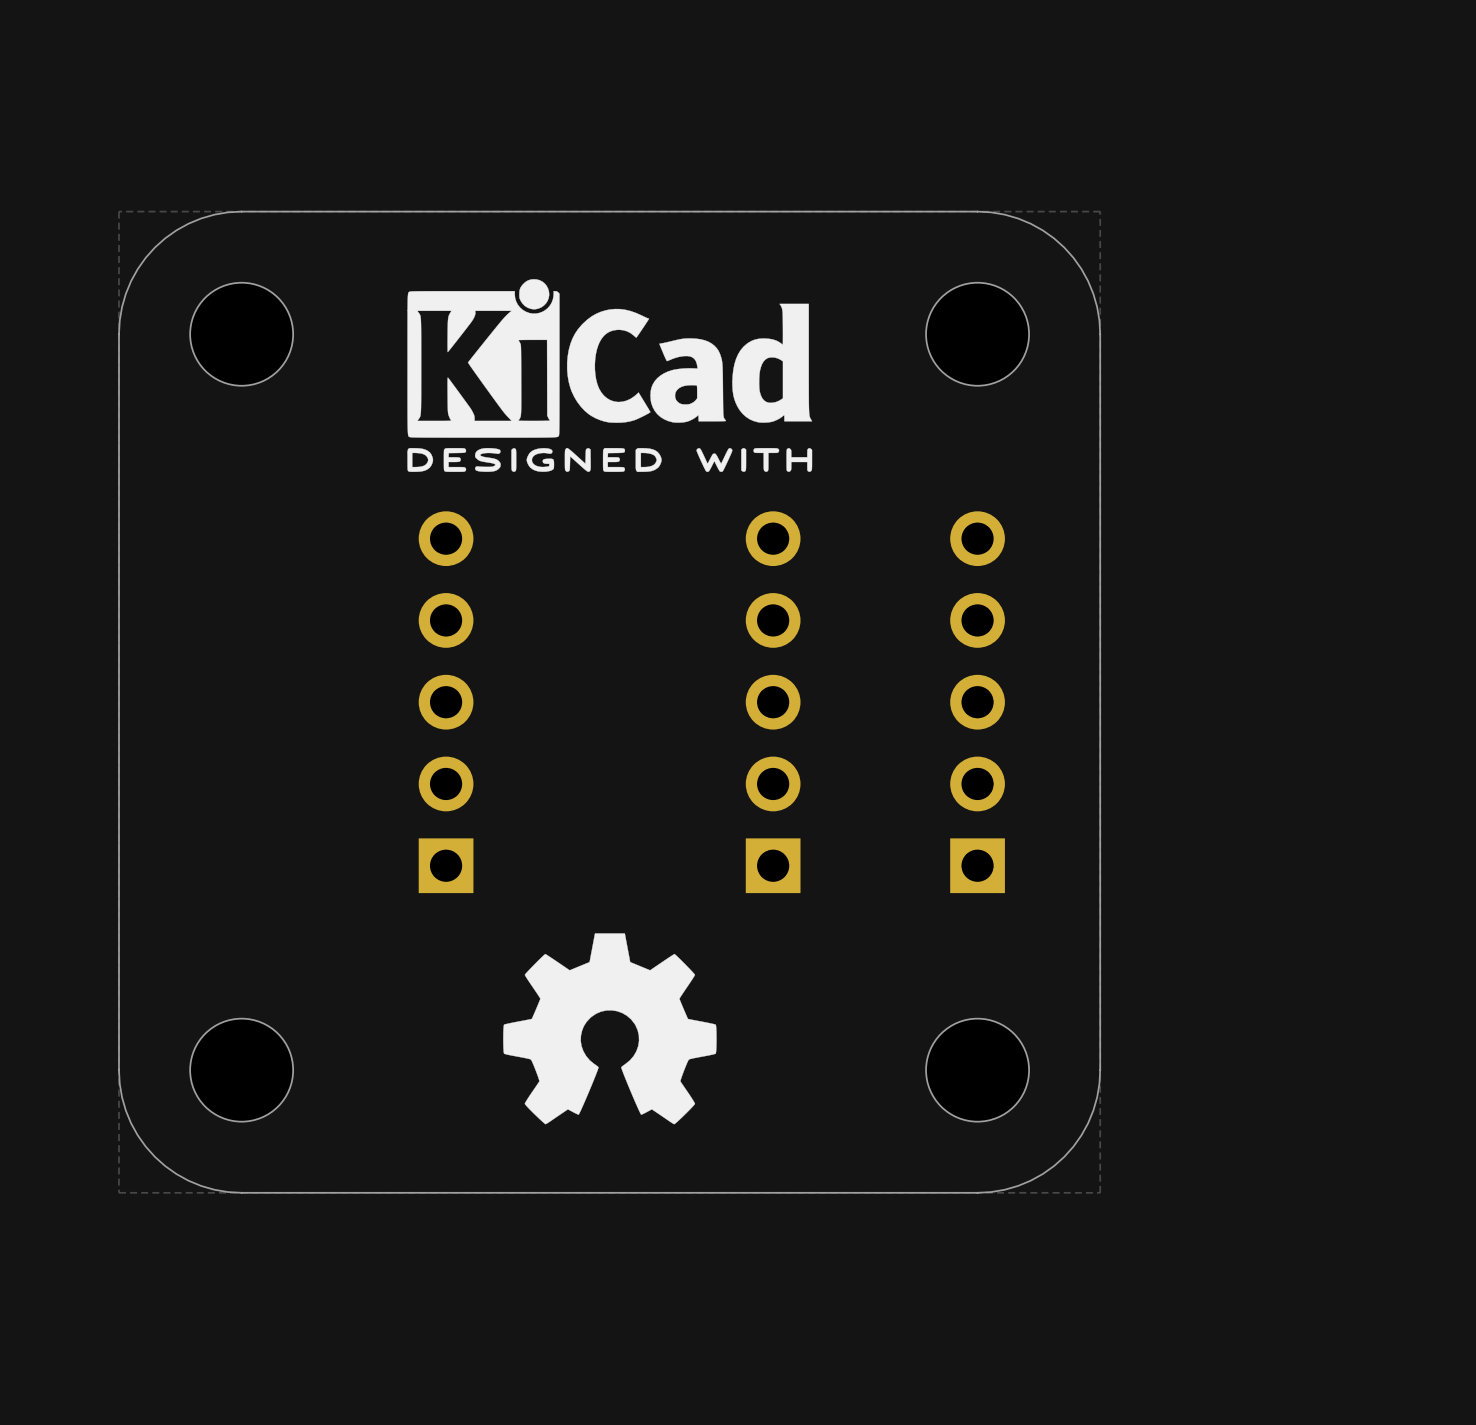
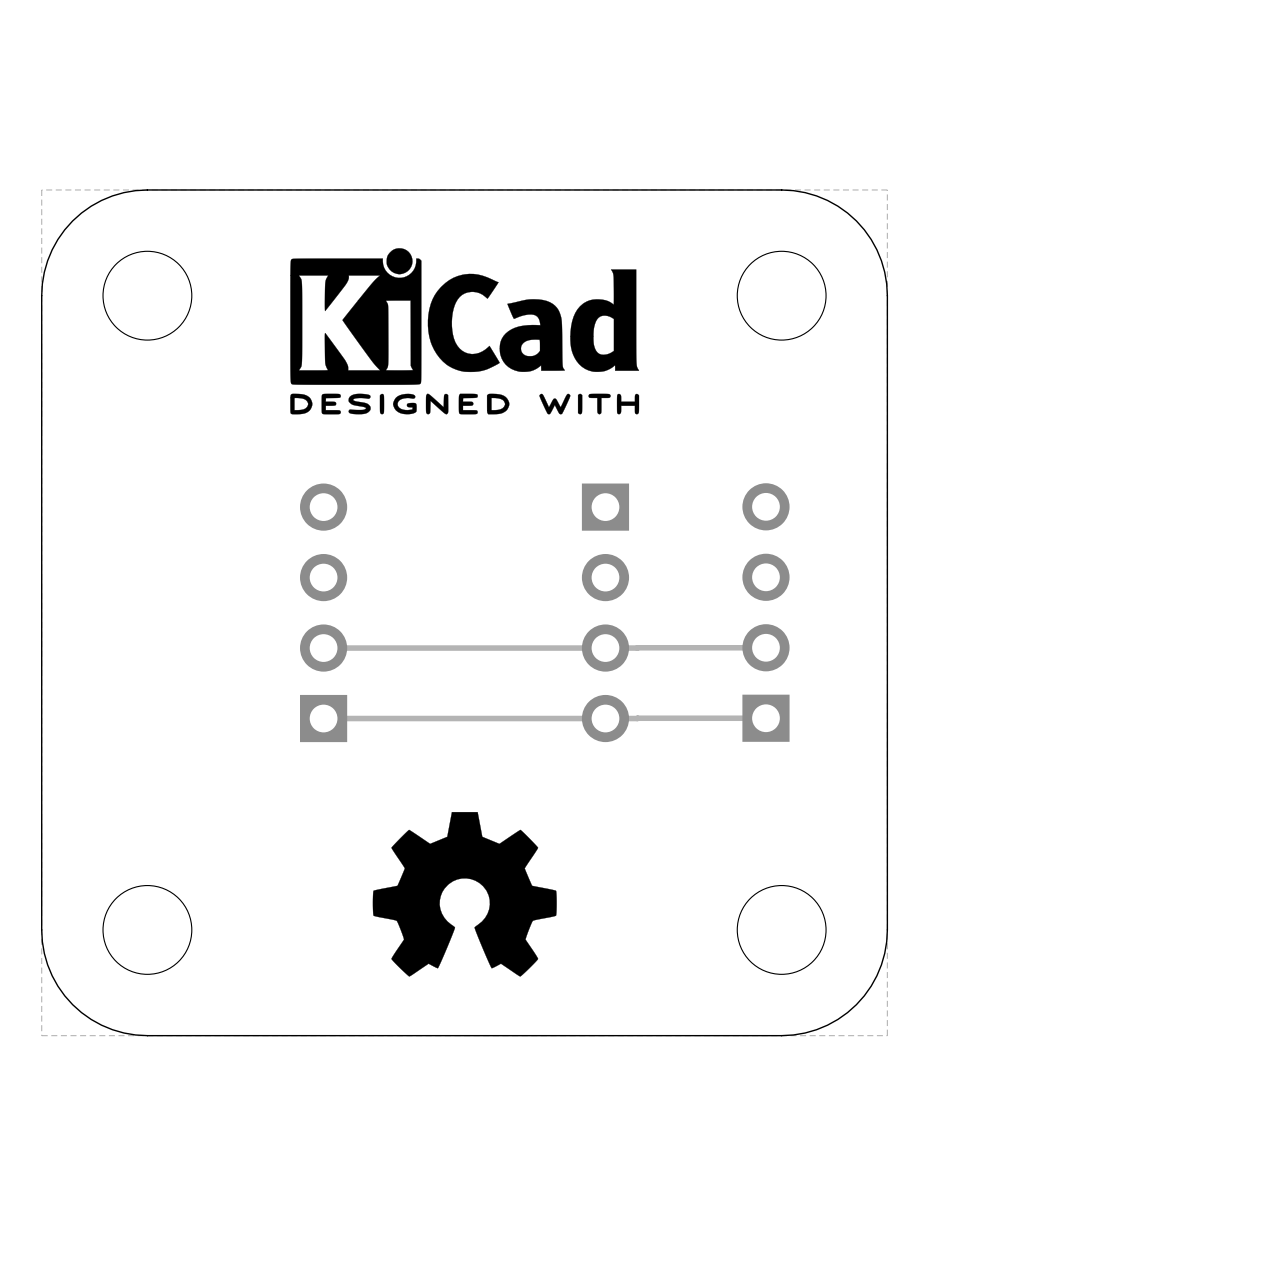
part footprint: [418, 511, 474, 894] -> [300, 483, 348, 743]
part footprint: [745, 511, 801, 894] -> [581, 483, 630, 743]
part footprint: [950, 511, 1005, 894] -> [742, 483, 790, 742]
track: none -> (765, 647) (637, 647)
track: none -> (637, 648) (323, 648)
track: none -> (637, 718) (323, 718)
track: none -> (765, 718) (637, 718)

